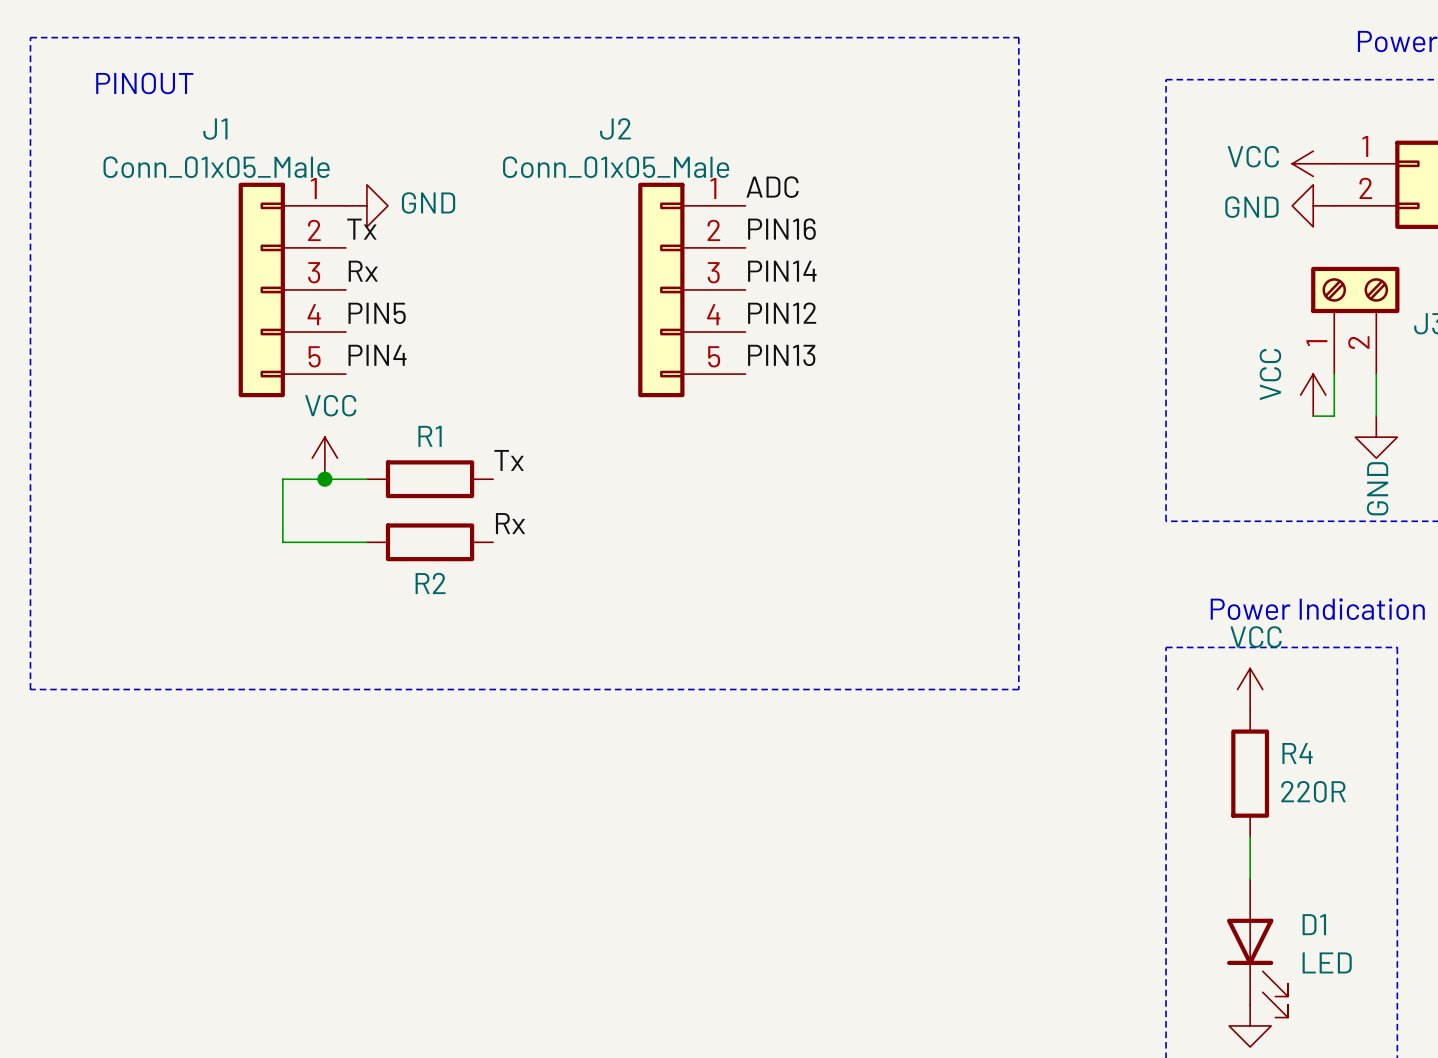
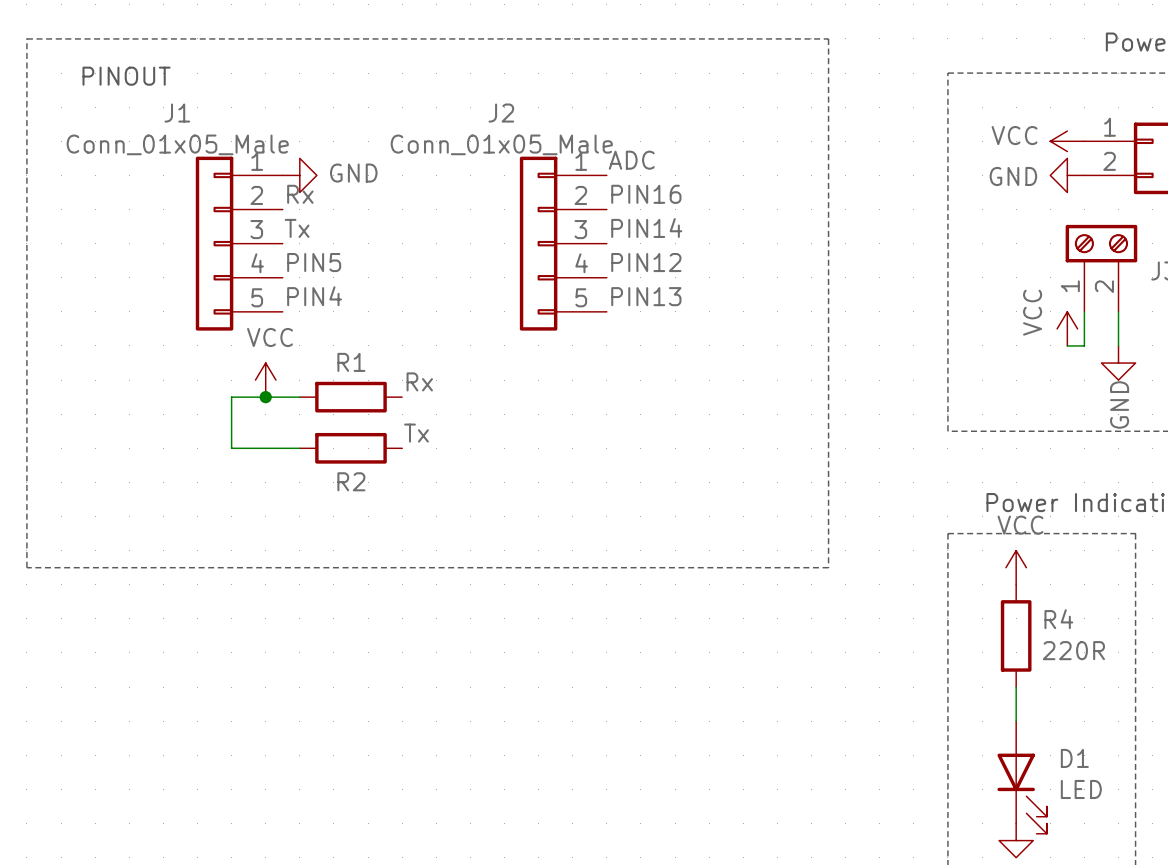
label: Tx (361, 229) -> Rx (300, 194)
label: Rx (363, 271) -> Tx (297, 228)
label: Tx (509, 460) -> Rx (419, 381)
label: Rx (510, 523) -> Tx (416, 433)

